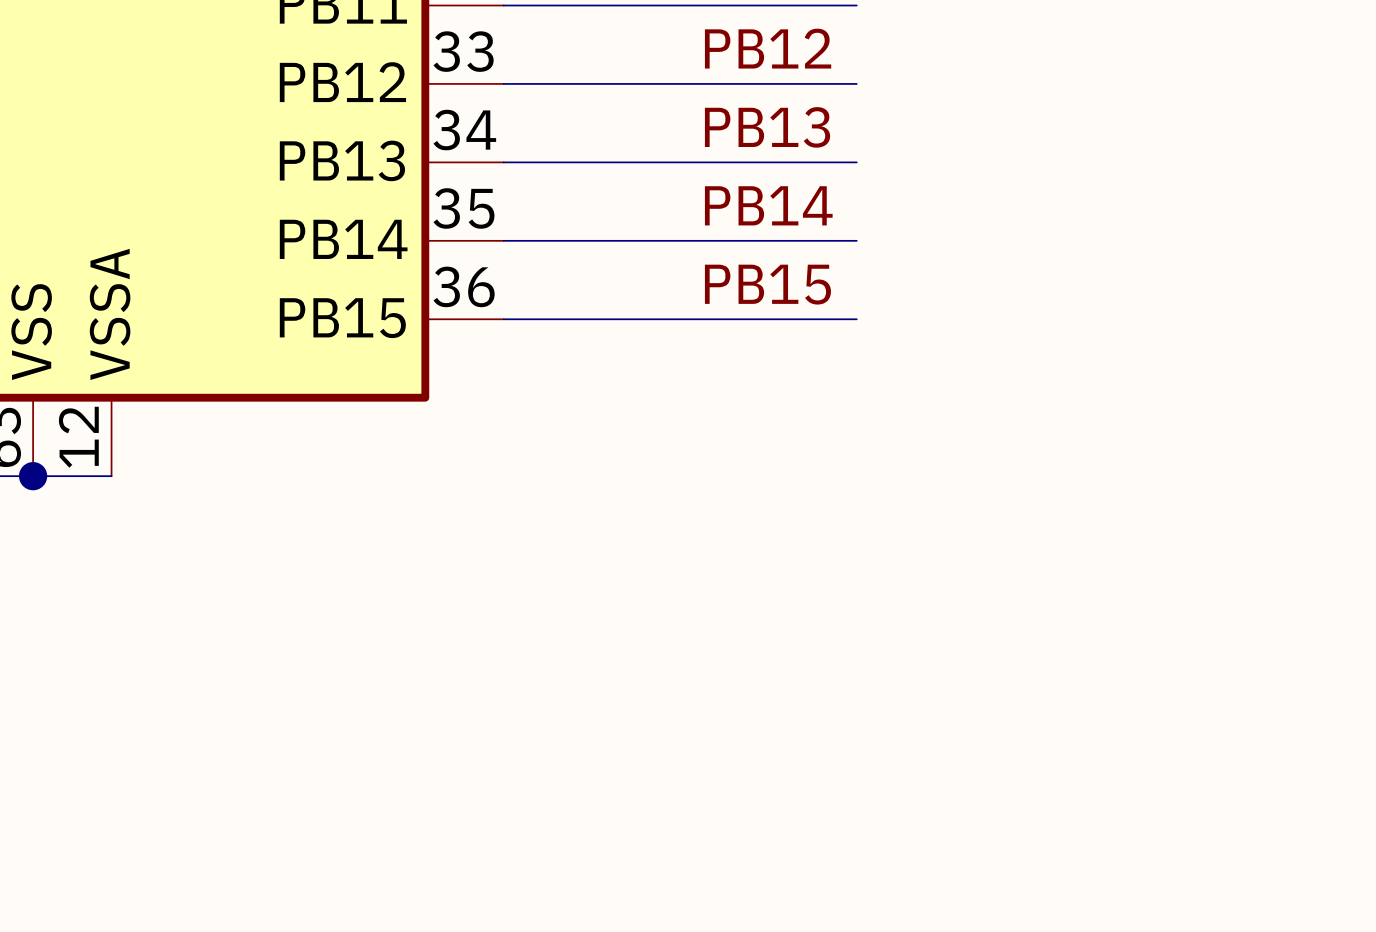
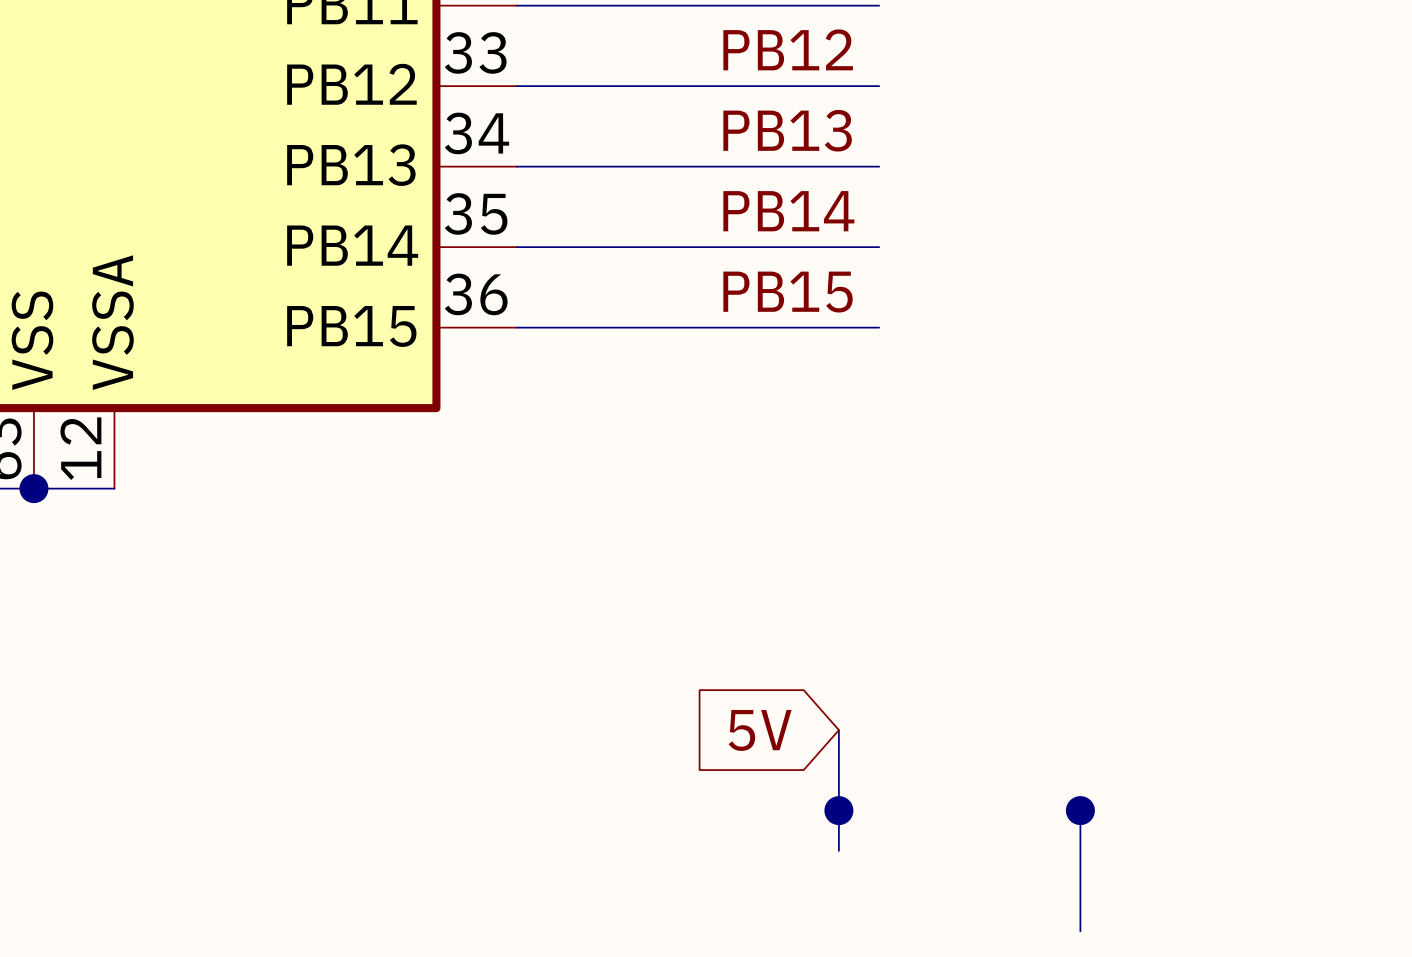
global label: none -> 5V (760, 730)
wire: none -> (838, 730) (838, 850)
junction: none -> (838, 810)
wire: none -> (1080, 810) (1080, 931)
junction: none -> (1080, 810)

